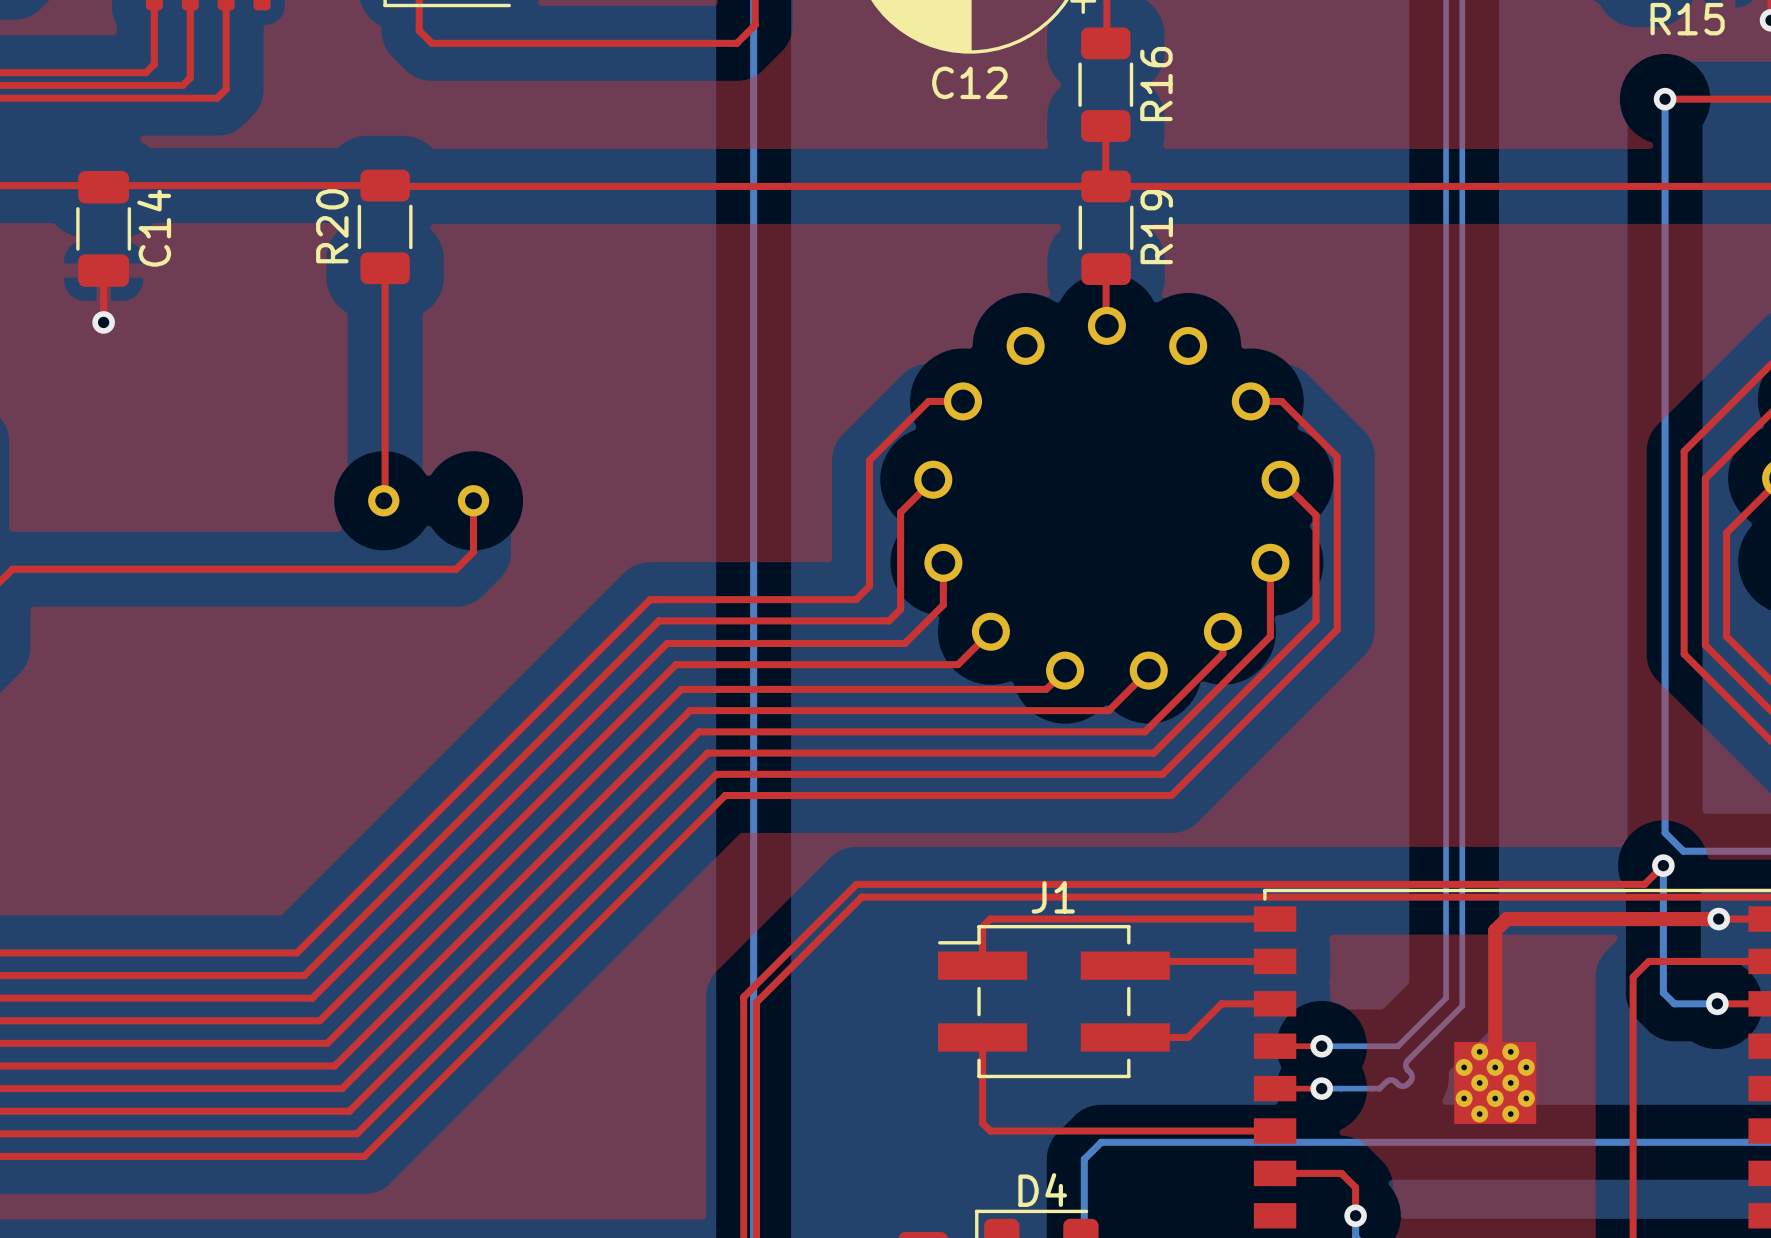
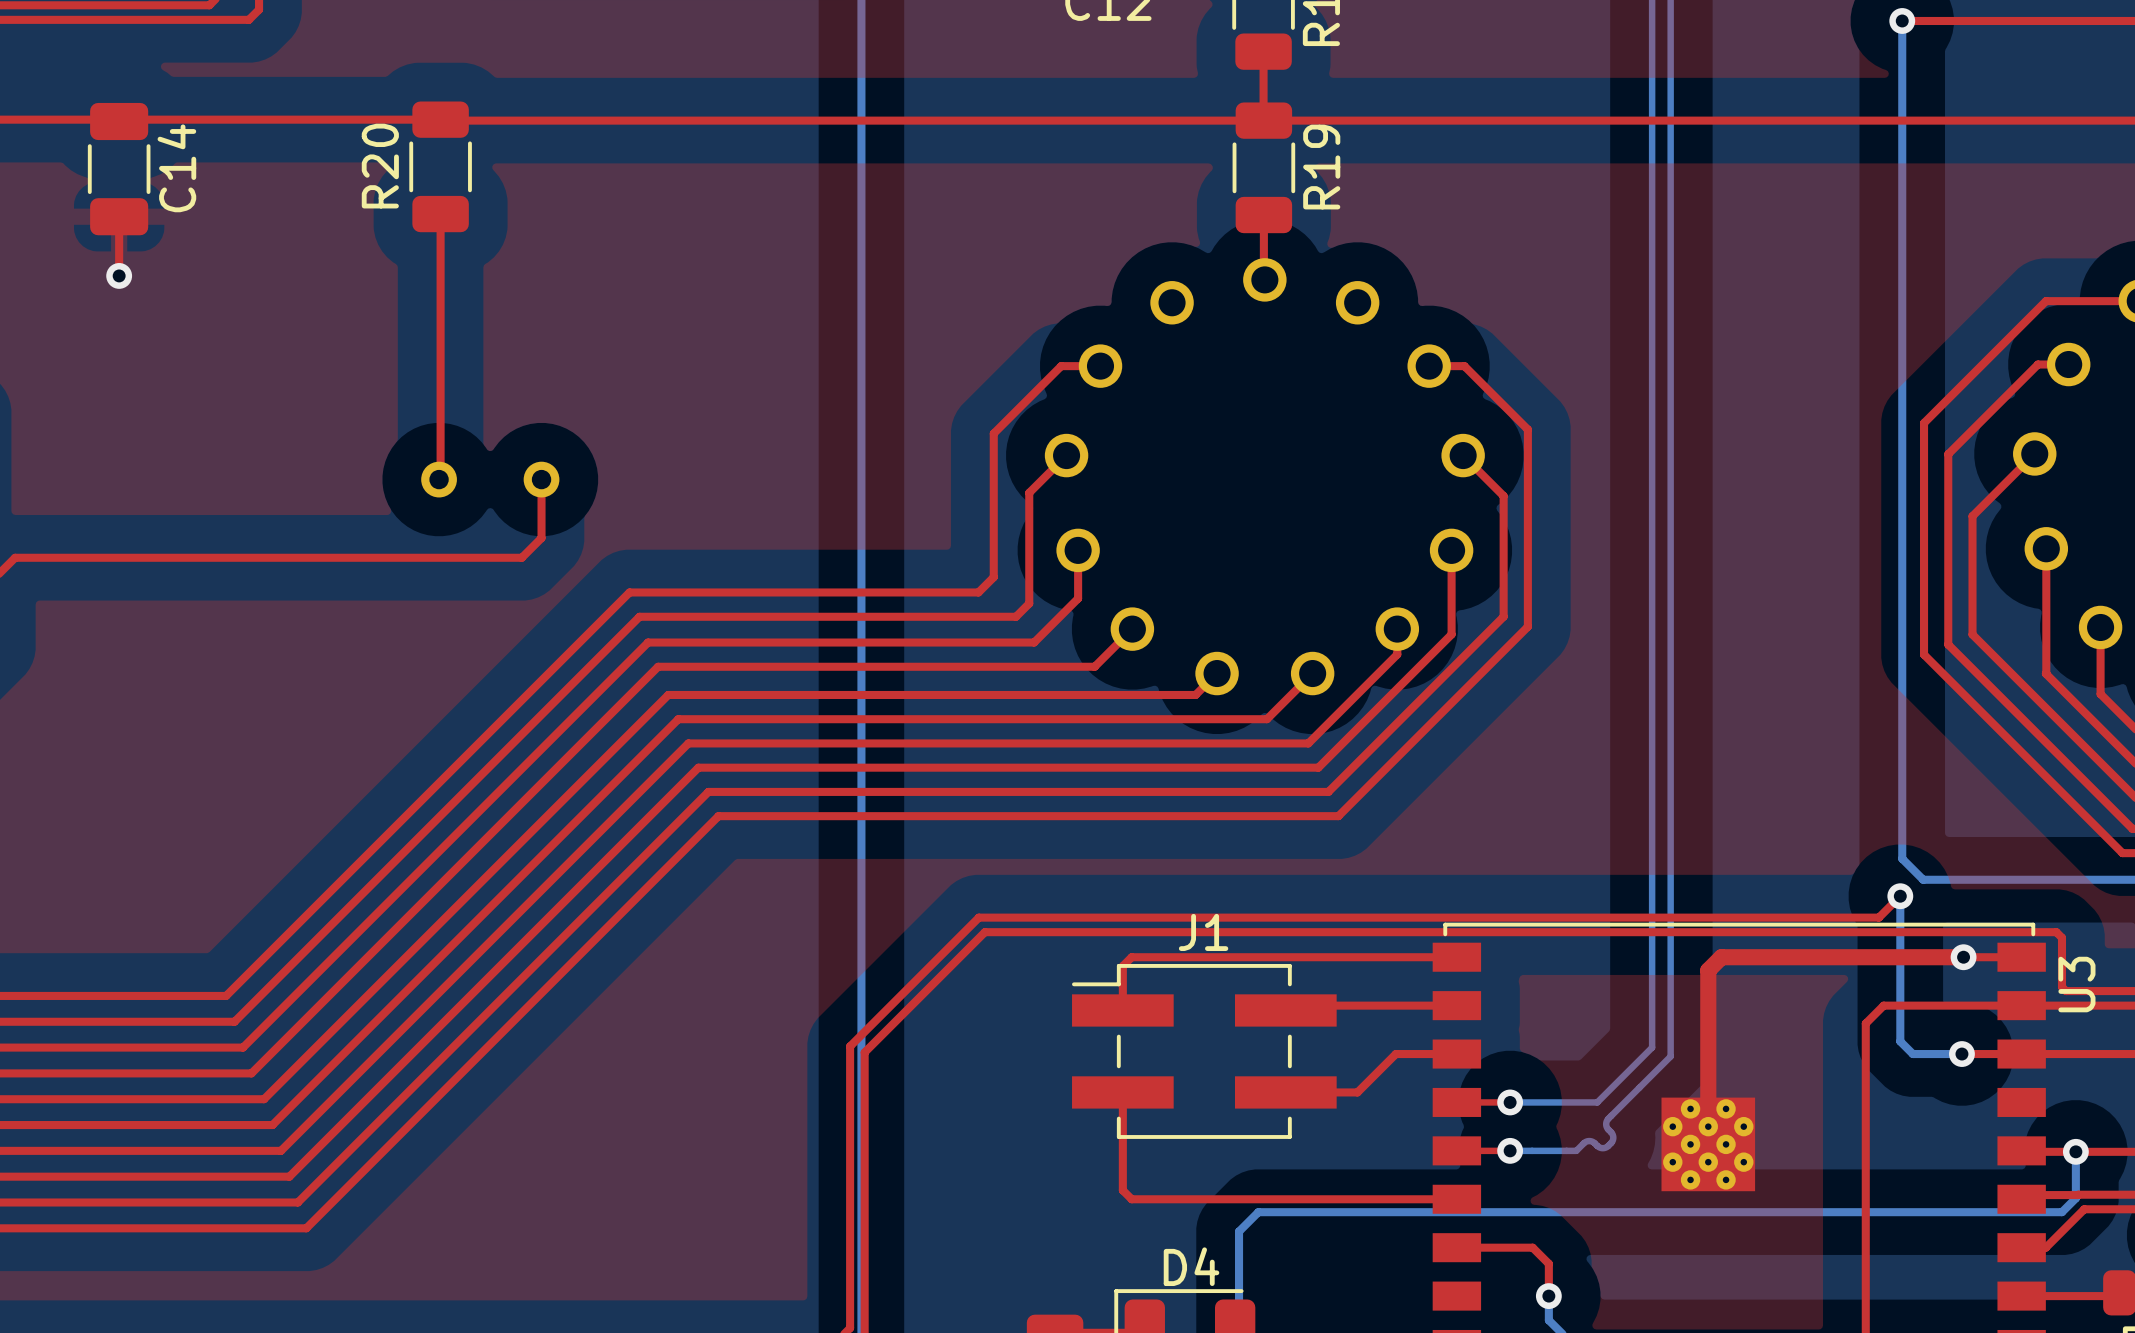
top track: (650, 599) (296, 952) (197, 952) -> (743, 592) (629, 592) (226, 995)
top track: (658, 620) (304, 975) (204, 975) -> (753, 616) (639, 616) (234, 1021)
top track: (667, 643) (312, 998) (212, 998) -> (762, 642) (648, 642) (243, 1047)
top track: (675, 664) (319, 1020) (219, 1020) -> (772, 666) (658, 666) (251, 1073)
top track: (681, 689) (327, 1043) (230, 1043) -> (778, 694) (668, 694) (264, 1099)
top track: (690, 710) (334, 1066) (237, 1066) -> (788, 719) (678, 719) (272, 1125)
top track: (698, 731) (342, 1088) (245, 1088) -> (798, 743) (688, 743) (280, 1150)
top track: (707, 753) (349, 1111) (252, 1111) -> (808, 767) (698, 767) (289, 1176)
top track: (716, 774) (356, 1133) (260, 1133) -> (819, 791) (708, 791) (297, 1202)
top track: (725, 795) (364, 1156) (267, 1156) -> (829, 816) (718, 816) (306, 1228)

